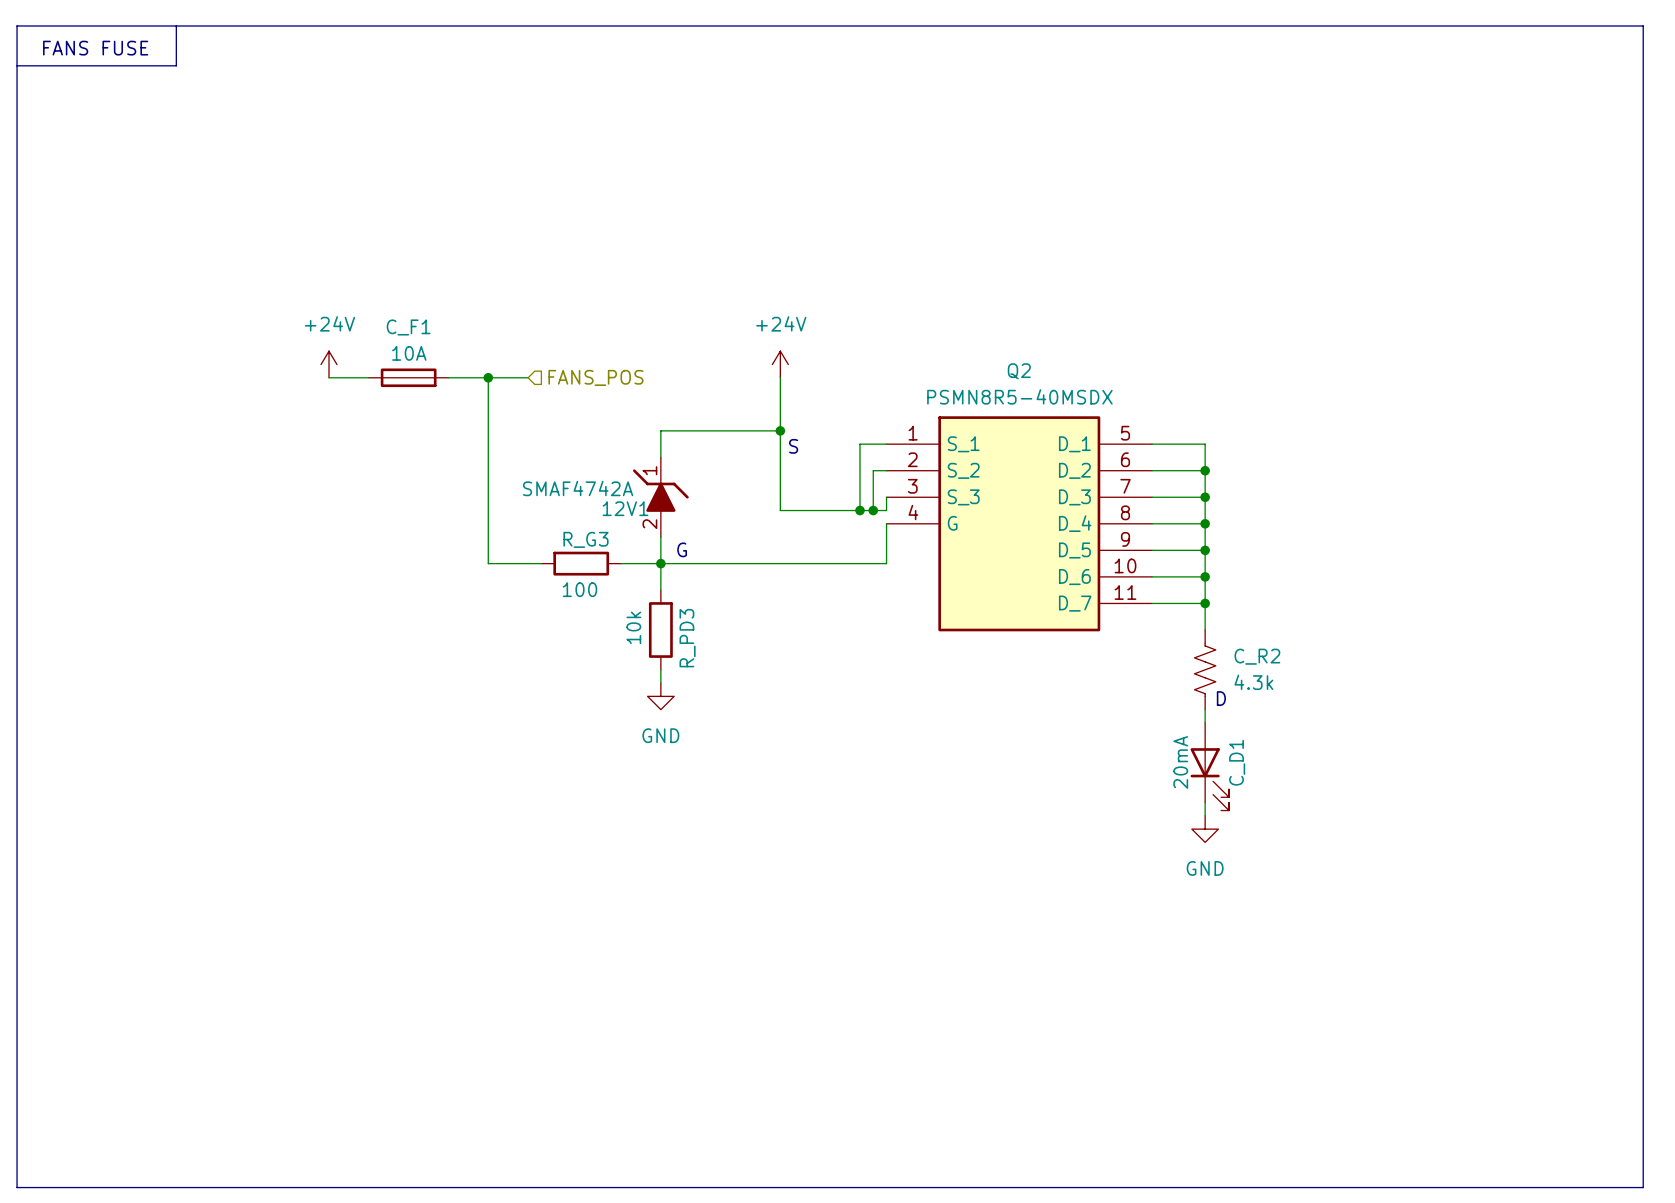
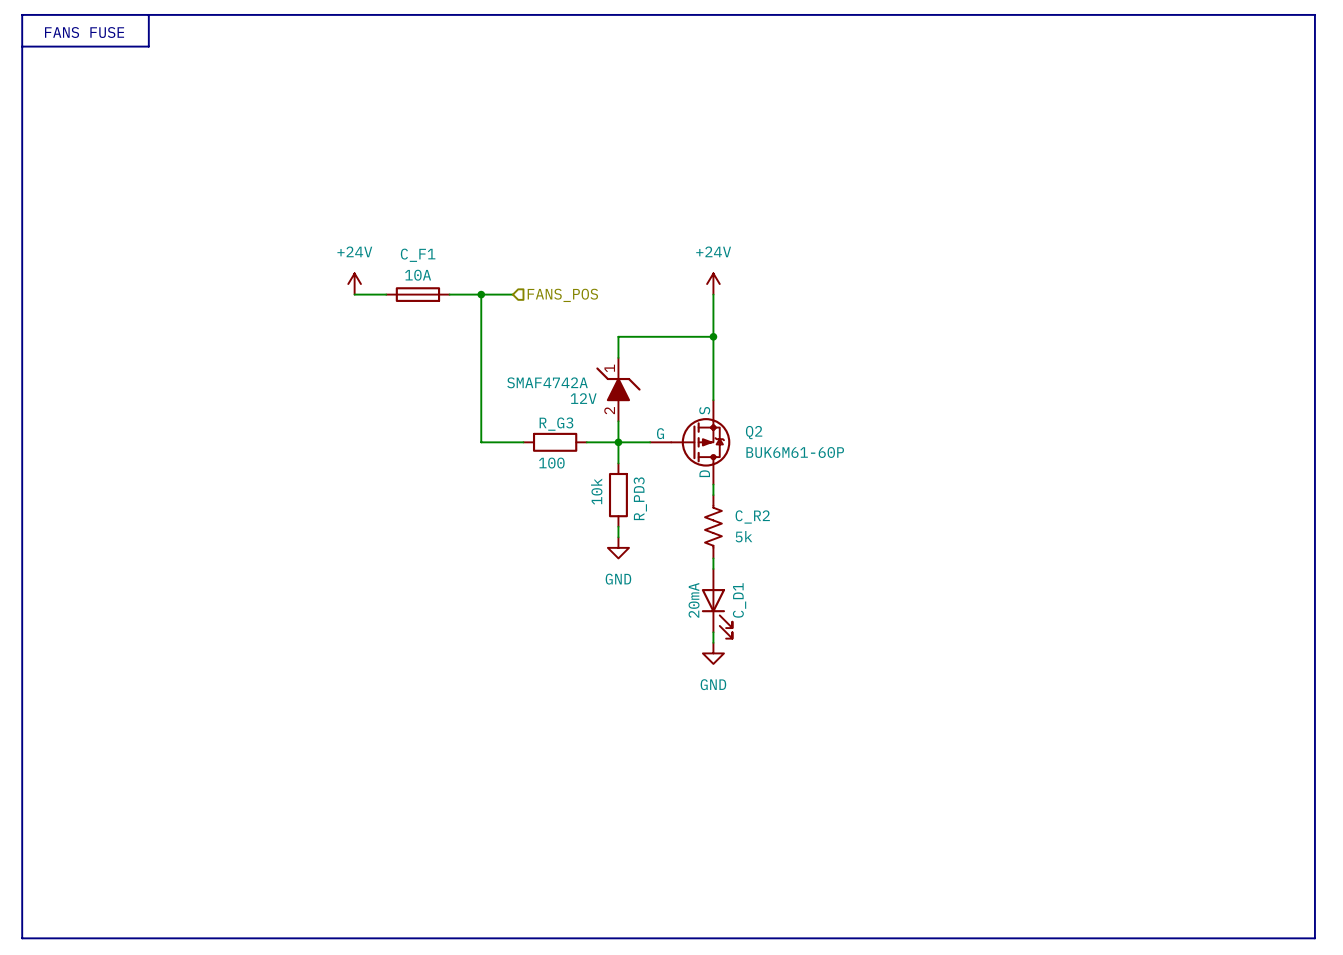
power symbol position: +24V (328, 364) -> +24V (354, 284)
power symbol position: +24V (780, 364) -> +24V (713, 284)
Q2 name position: Q2 (1019, 371) -> Q2 (754, 432)
wire: (328, 377) (368, 377) -> none
C_F1 position: (408, 377) -> (417, 294)
wire: (488, 377) (488, 563) (541, 563) -> none
junction: (488, 377) -> none
wire: none -> (481, 294) (481, 442) (502, 442)
junction: none -> (481, 294)
hierarchical label position: FANS_POS (595, 377) -> FANS_POS (562, 295)
wire: (780, 377) (780, 510) (886, 510) -> none
wire: none -> (713, 294) (713, 389)
Q2 value: PSMN8R5-40MSDX (1019, 396) -> BUK6M61-60P (795, 452)
Q2 symbol: [886, 416, 1153, 632] -> [650, 400, 731, 485]
wire: (767, 430) (660, 430) (660, 457) -> (618, 336) (618, 357)
wire: none -> (629, 336) (713, 336)
junction: (780, 430) -> none
junction: none -> (713, 336)
wire: (886, 444) (859, 444) (859, 510) -> none
wire: (1152, 444) (1205, 444) (1205, 630) -> none
text: S (793, 446) -> none
wire: (886, 470) (873, 470) (873, 510) -> none
wire: (1152, 470) (1205, 470) -> none
junction: (1205, 470) -> none
12V1: SMAF4742A (660, 497) -> none
12V: none -> SMAF4742A (618, 389)
wire: (1152, 497) (1205, 497) -> none
junction: (1205, 497) -> none
junction: (859, 510) -> none
junction: (873, 510) -> none
wire: (1152, 523) (1205, 523) -> none
junction: (1205, 523) -> none
wire: (660, 537) (660, 590) -> (618, 421) (618, 463)
text: G (682, 549) -> none
wire: (1152, 550) (1205, 550) -> none
junction: (1205, 550) -> none
R_G3 position: (581, 563) -> (555, 442)
wire: (647, 563) (727, 563) -> (449, 294) (512, 294)
junction: (660, 563) -> none
junction: none -> (618, 442)
wire: (1152, 576) (1205, 576) -> none
junction: (1205, 576) -> none
wire: (1152, 603) (1205, 603) -> none
junction: (1205, 603) -> none
wire: none -> (713, 484) (713, 495)
R_PD3 position: (660, 630) -> (618, 495)
wire: (660, 669) (660, 683) -> (618, 526) (618, 537)
C_R2 position: (1205, 669) -> (713, 526)
C_R2 value: 4.3k (1253, 682) -> 5k (743, 536)
power symbol position: GND (660, 696) -> GND (618, 547)
text: D (1221, 698) -> none
wire: none -> (713, 558) (713, 568)
wire: (1205, 709) (1205, 722) -> none
C_D1 position: (1209, 766) -> (717, 603)
wire: none -> (713, 632) (713, 642)
wire: (1205, 802) (1205, 815) -> none
power symbol: none -> GND (713, 653)
power symbol: GND (1205, 829) -> none

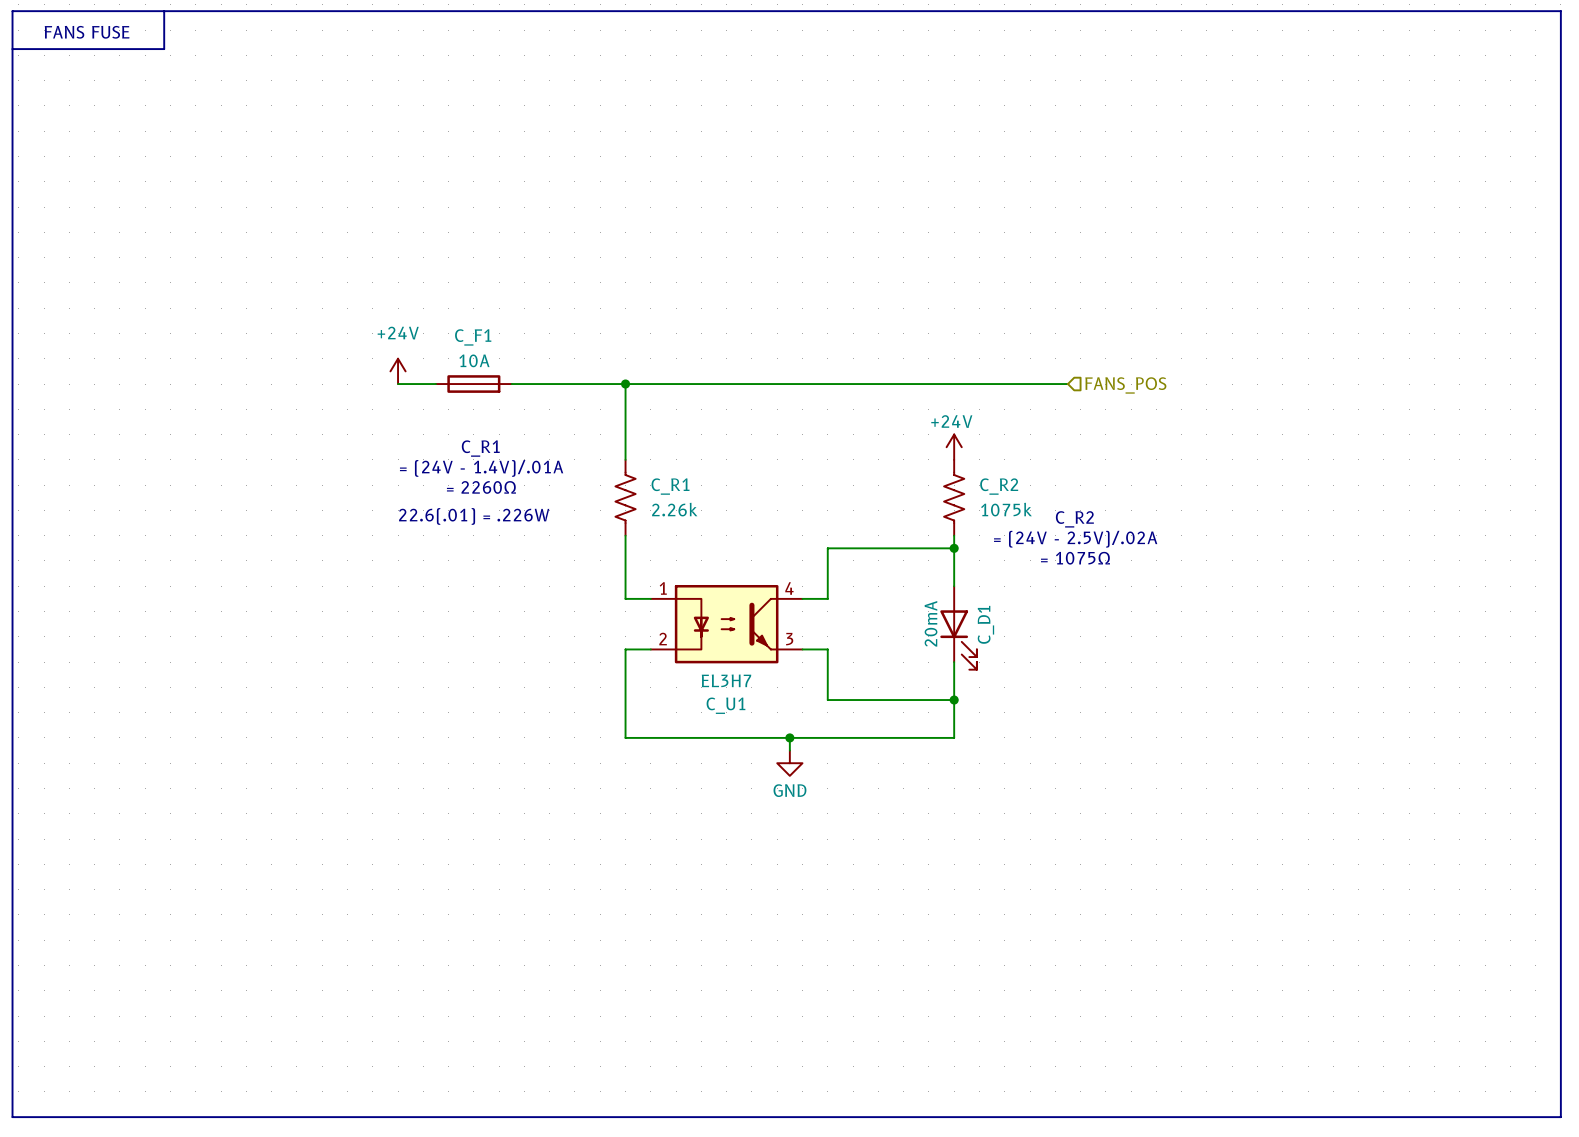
power symbol text position: +24V (713, 251) -> +24V (951, 421)
power symbol position: +24V (354, 284) -> +24V (398, 371)
power symbol position: +24V (713, 284) -> +24V (954, 447)
wire: (354, 294) (386, 294) -> (398, 384) (435, 384)
C_F1 position: (417, 294) -> (473, 384)
wire: (449, 294) (512, 294) -> none
wire: (481, 294) (481, 442) (523, 442) -> none
junction: (481, 294) -> none
wire: (713, 294) (713, 400) -> none
hierarchical label: FANS_POS (562, 295) -> none
wire: none -> (511, 384) (1067, 384)
wire: none -> (625, 384) (625, 459)
junction: none -> (625, 384)
hierarchical label: none -> FANS_POS (1125, 385)
wire: (713, 336) (618, 336) (618, 357) -> none
junction: (713, 336) -> none
text: none -> C_R1 (480, 448)
12V: SMAF4742A (618, 389) -> none
text: none -> = (24V - 1.4V)/.01A (481, 468)
text: none -> = 2260Ω (481, 487)
C_R1: none -> 2.26k (625, 497)
wire: (618, 421) (618, 463) -> (954, 535) (954, 586)
text: none -> 22.6(.01) = .226W (474, 516)
text: none -> C_R2 (1074, 519)
R_G3: 100 (555, 442) -> none
wire: (586, 442) (650, 442) -> none
junction: (618, 442) -> none
Q2: BUK6M61-60P (690, 442) -> none
wire: none -> (625, 535) (625, 598) (650, 598)
text: none -> = (24V - 2.5V)/.02A (1075, 539)
wire: none -> (954, 548) (827, 548) (827, 598) (802, 598)
junction: none -> (954, 548)
text: none -> = 1075Ω (1075, 558)
wire: (713, 484) (713, 495) -> none
R_PD3: 10k (618, 495) -> none
C_U1: none -> EL3H7 (726, 624)
C_R2 position: (713, 526) -> (954, 497)
C_R2 value: 5k (743, 536) -> 1075k (1006, 509)
wire: none -> (650, 649) (625, 649) (625, 737) (954, 737) (954, 662)
power symbol: GND (618, 547) -> none
wire: none -> (802, 649) (827, 649) (827, 700) (954, 700)
wire: (713, 558) (713, 568) -> none
junction: none -> (954, 700)
C_D1 position: (717, 603) -> (958, 627)
junction: none -> (789, 737)
wire: (713, 632) (713, 642) -> (789, 737) (789, 750)
power symbol position: GND (713, 653) -> GND (789, 763)
power symbol text position: GND (713, 684) -> GND (789, 790)

